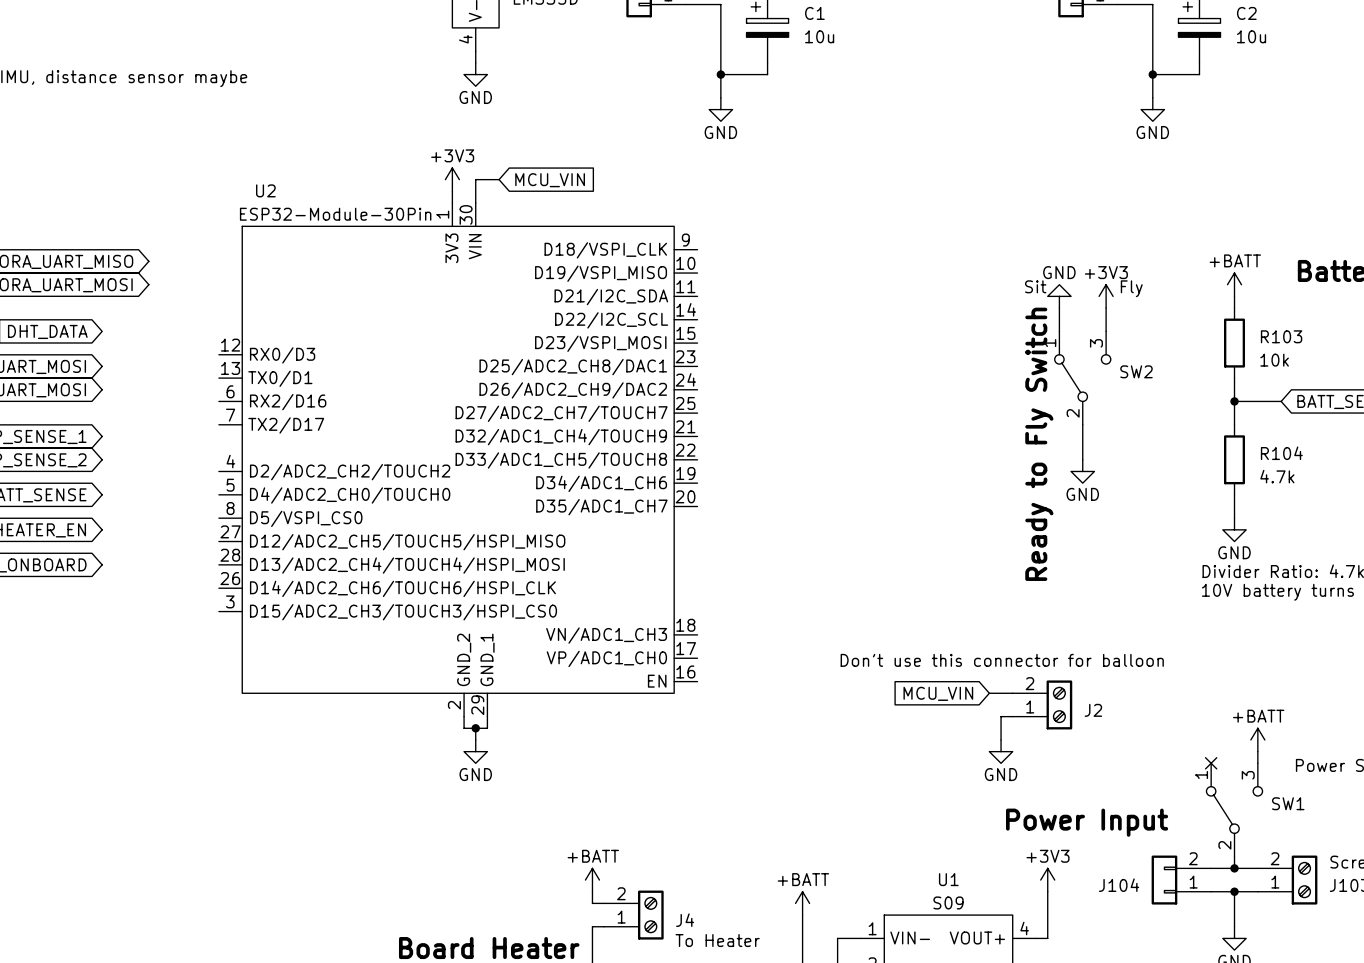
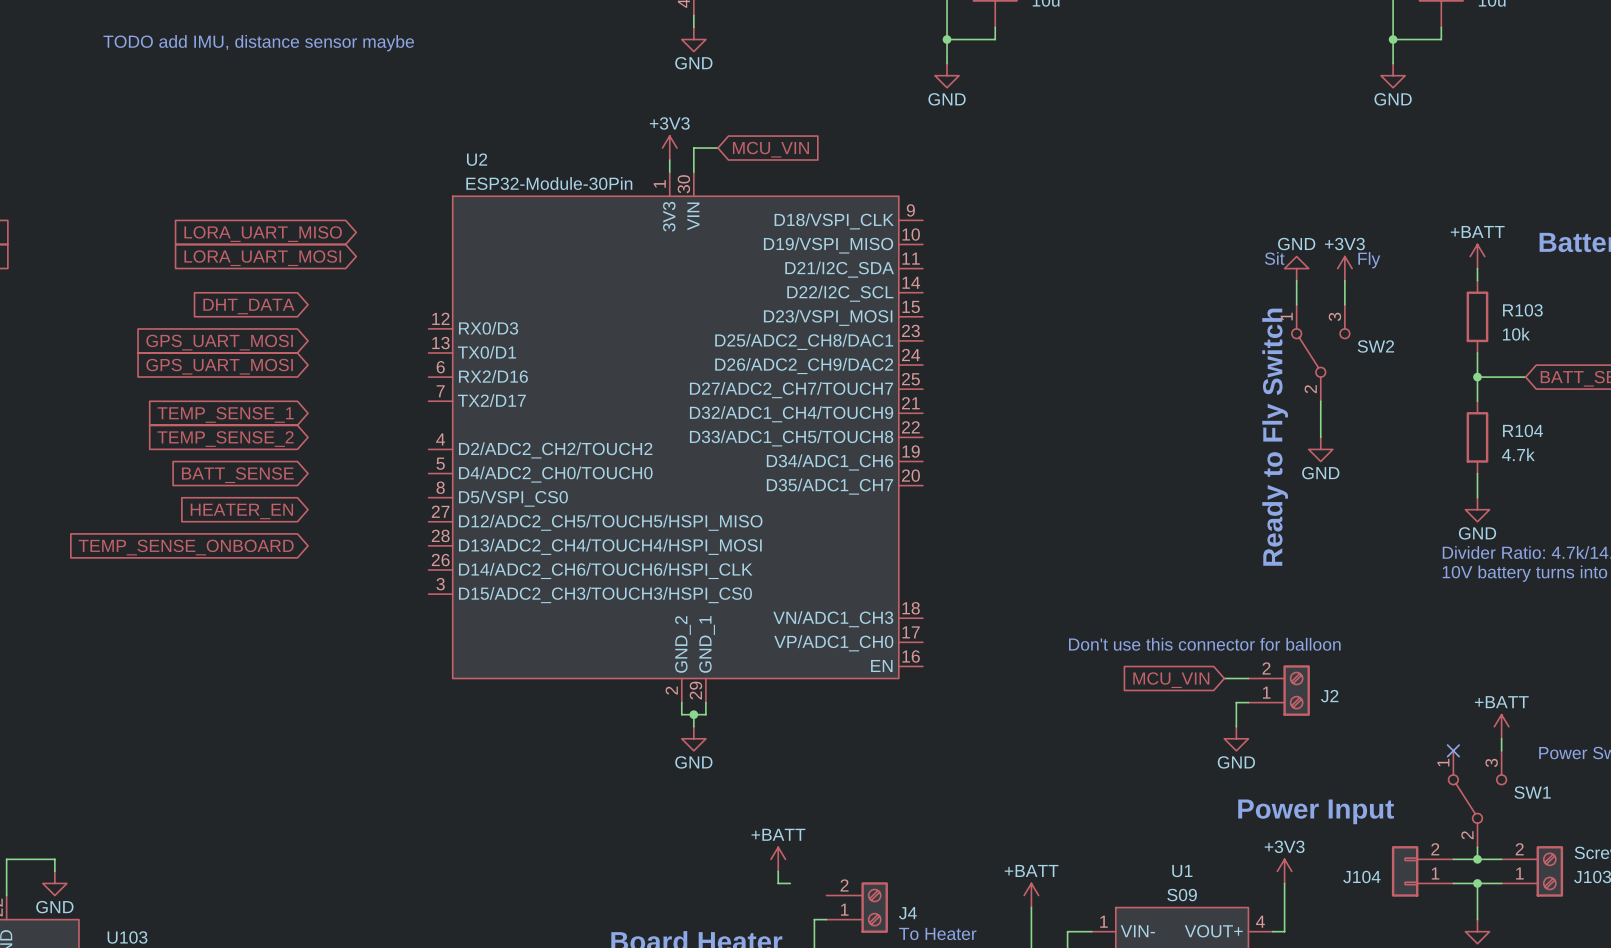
power symbol position: +BATT (592, 880) -> +BATT (778, 859)
wire: (592, 891) (592, 903) (604, 903) -> (778, 871) (778, 883) (790, 883)

